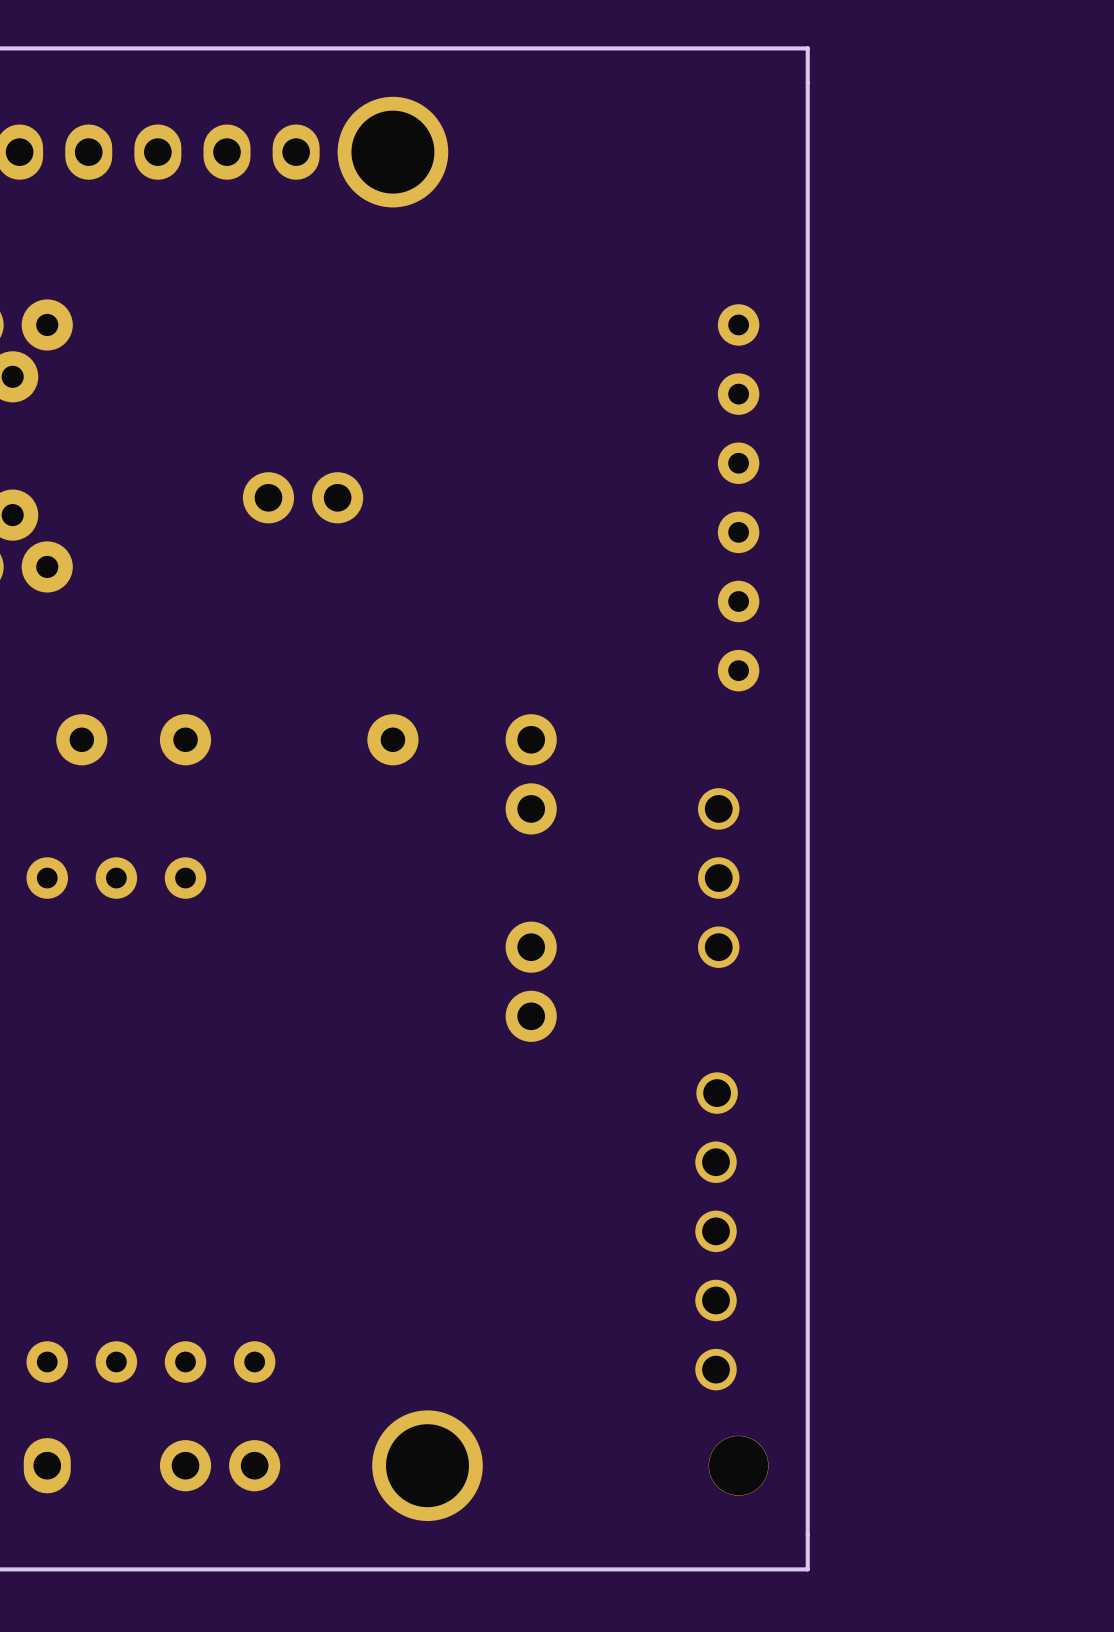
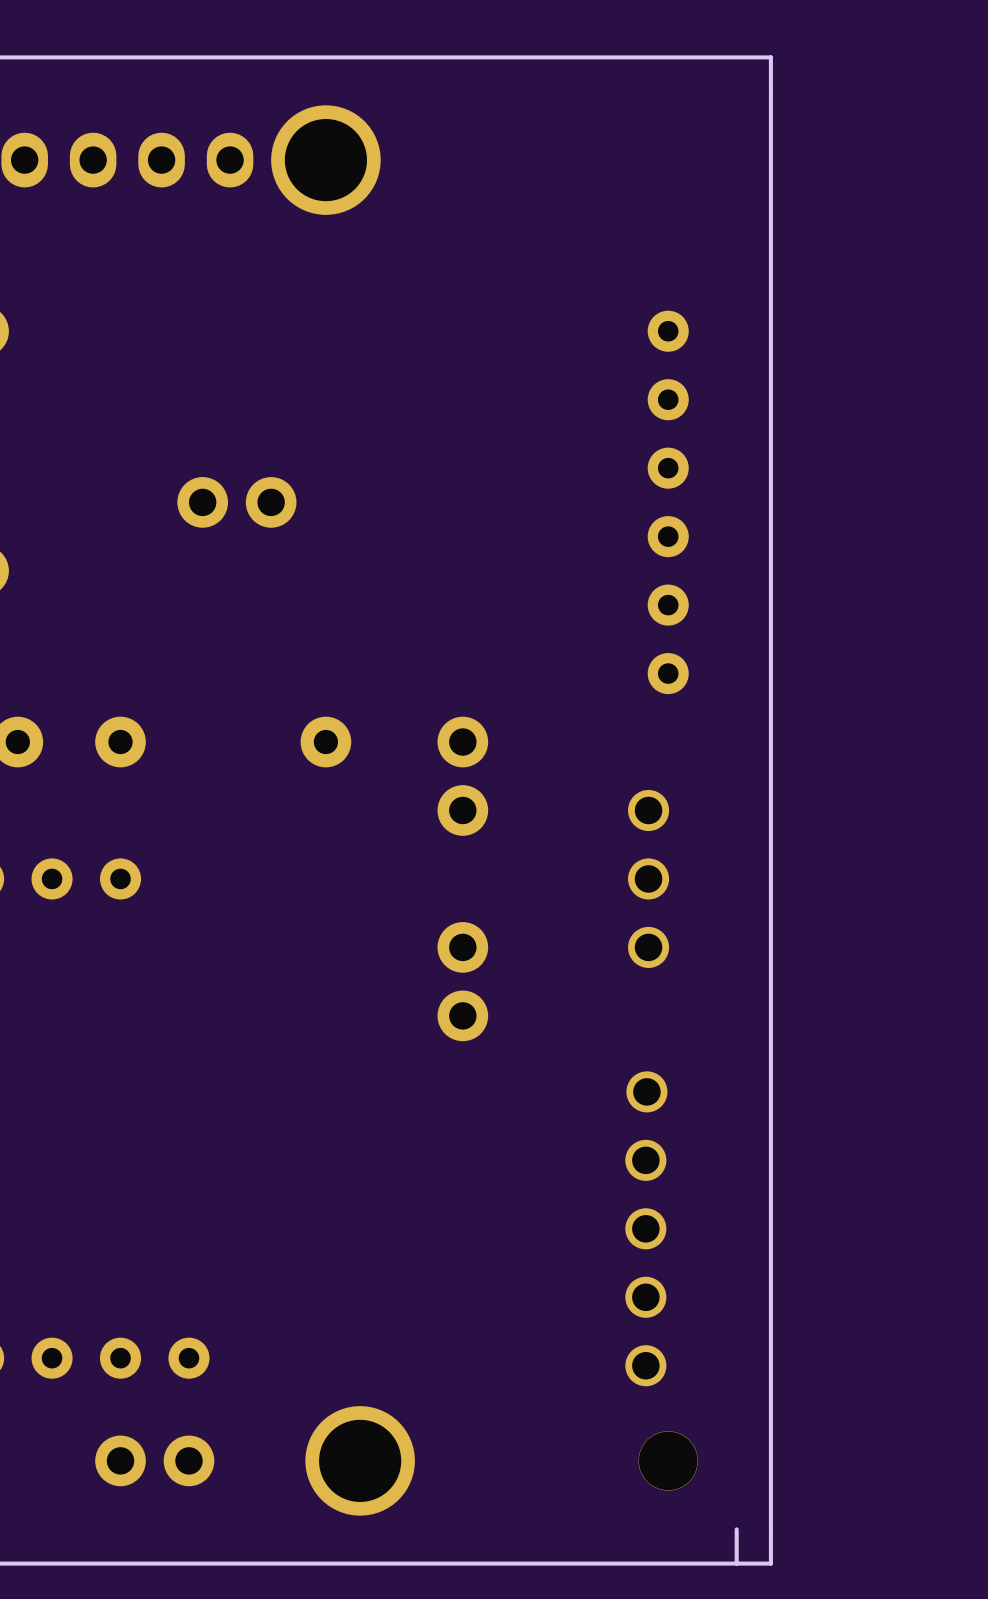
board edge: (807, 48) (807, 1534) -> (736, 57) (770, 57) (770, 1563) (736, 1563)

